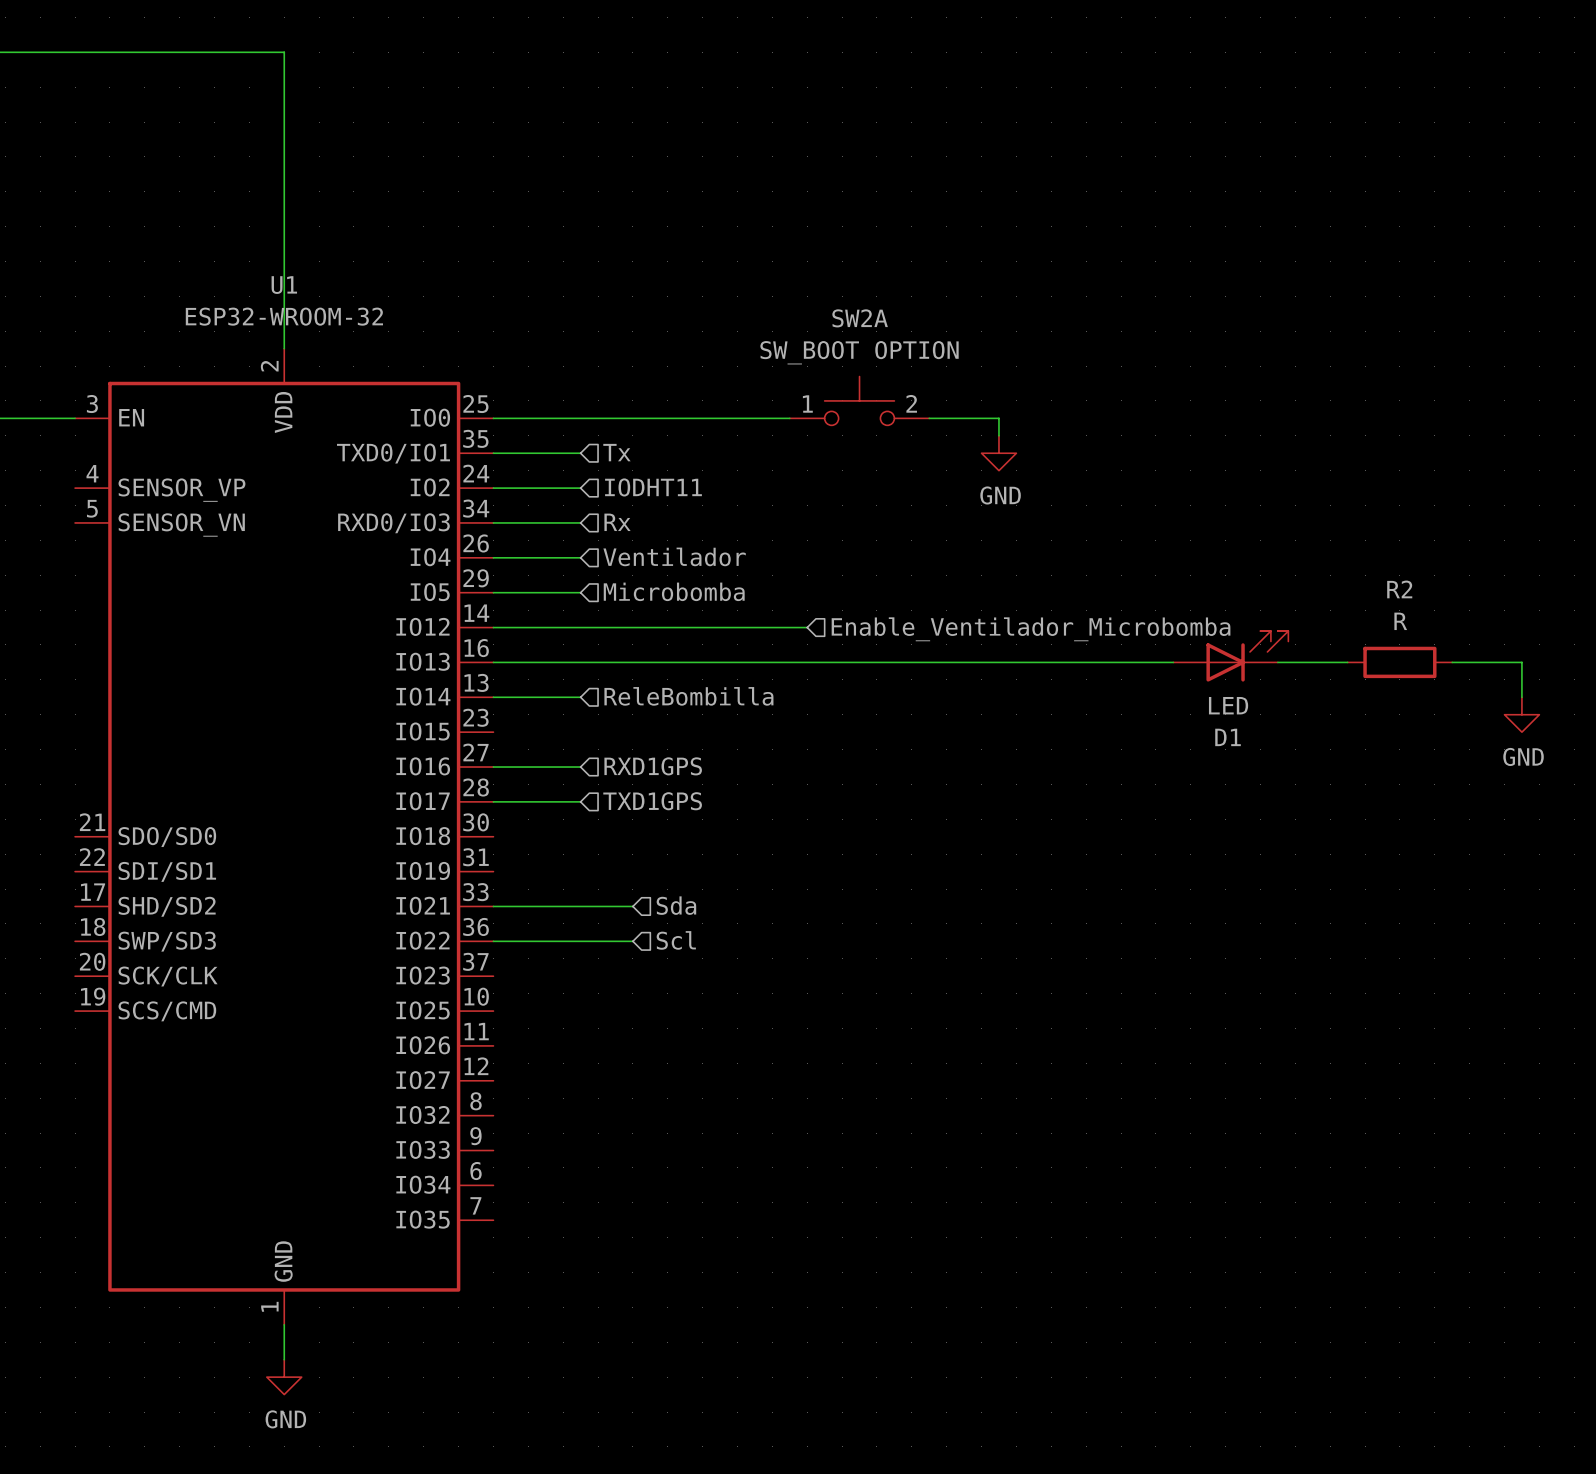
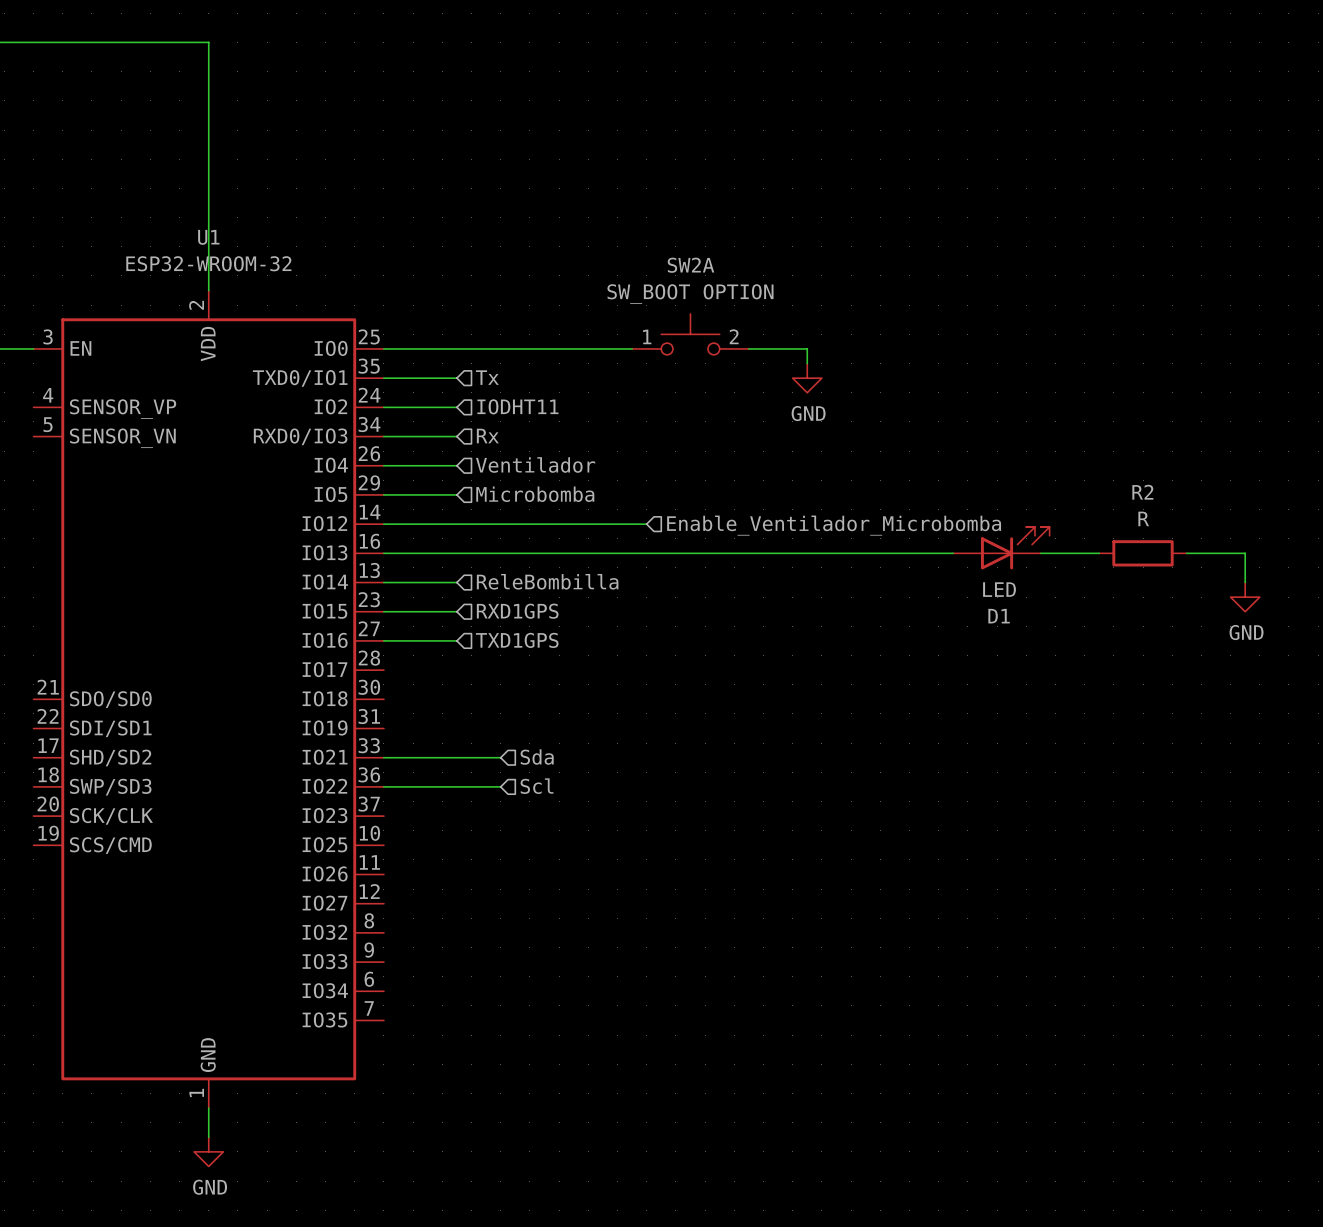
hierarchical label: none -> RXD1GPS (517, 611)
hierarchical label: RXD1GPS (653, 766) -> TXD1GPS (517, 640)
wire: (493, 801) (580, 801) -> (383, 611) (456, 611)
hierarchical label: TXD1GPS (652, 801) -> none

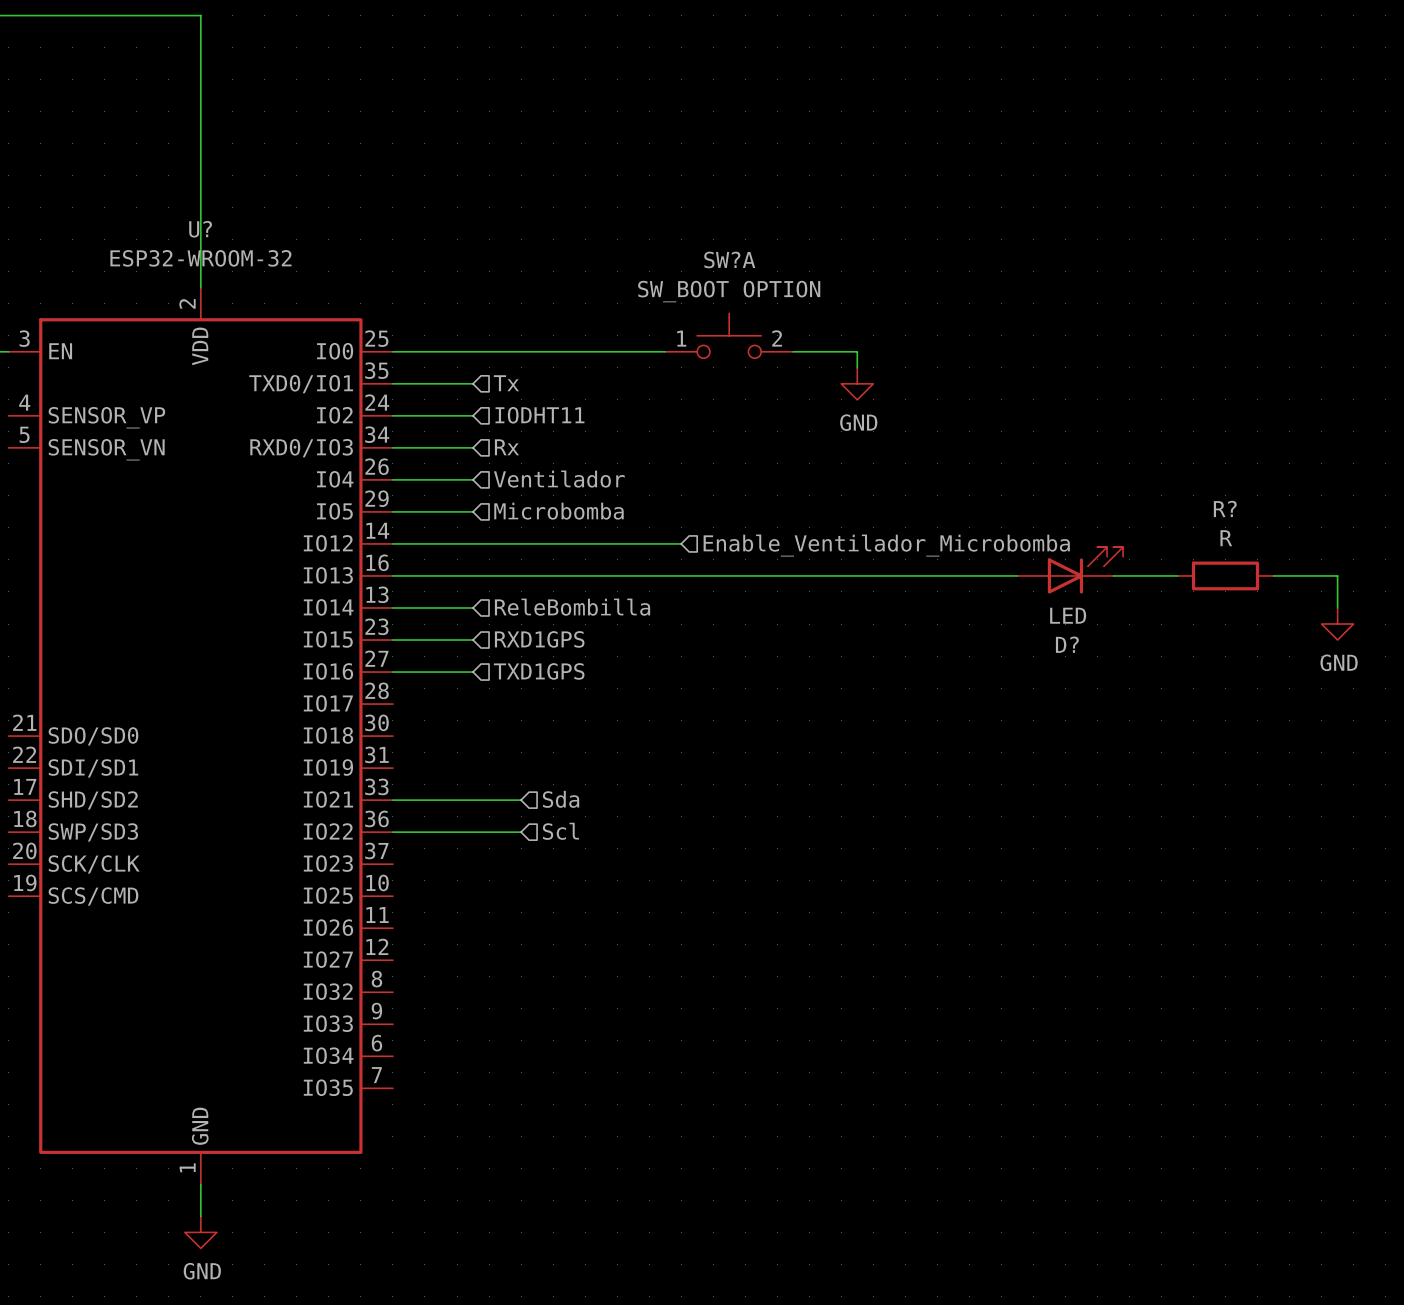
U1 name: U1 (208, 237) -> U? (200, 229)
SW2A name: SW2A (690, 265) -> SW?A (729, 259)
R2 name: R2 (1142, 492) -> R? (1225, 508)
D1 name: D1 (999, 616) -> D? (1067, 644)

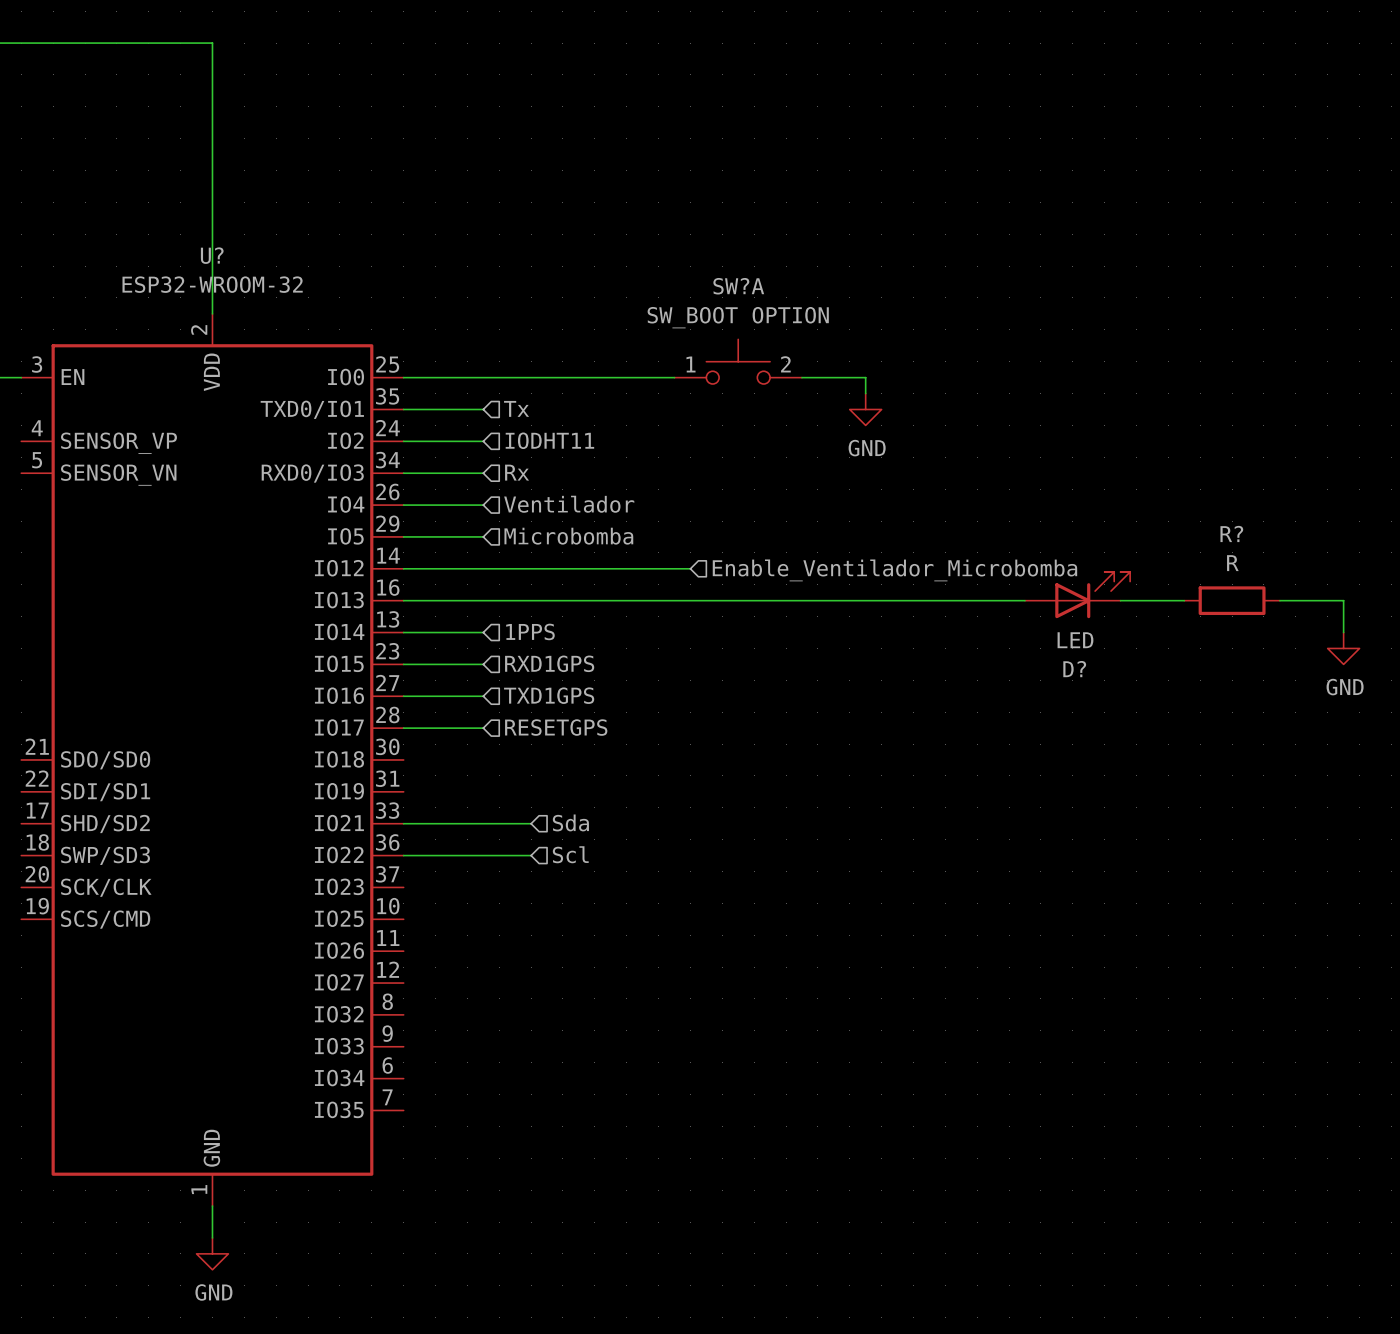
hierarchical label: ReleBombilla (572, 607) -> 1PPS (530, 631)
hierarchical label: none -> RESETGPS (556, 727)
wire: none -> (403, 728) (483, 728)

